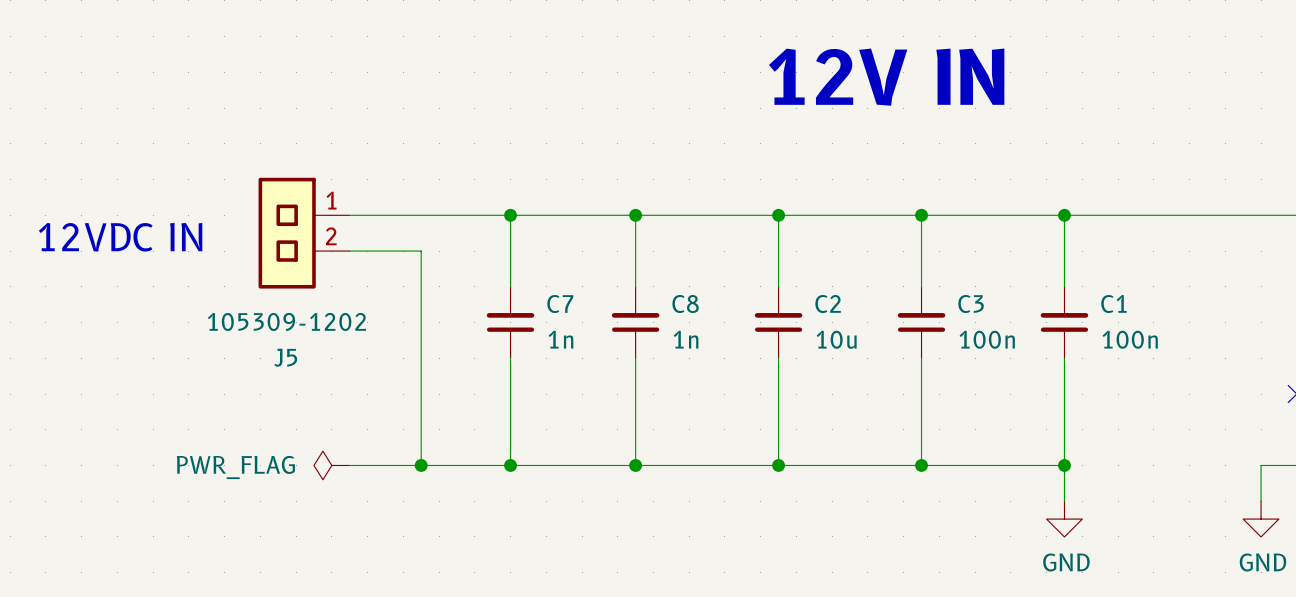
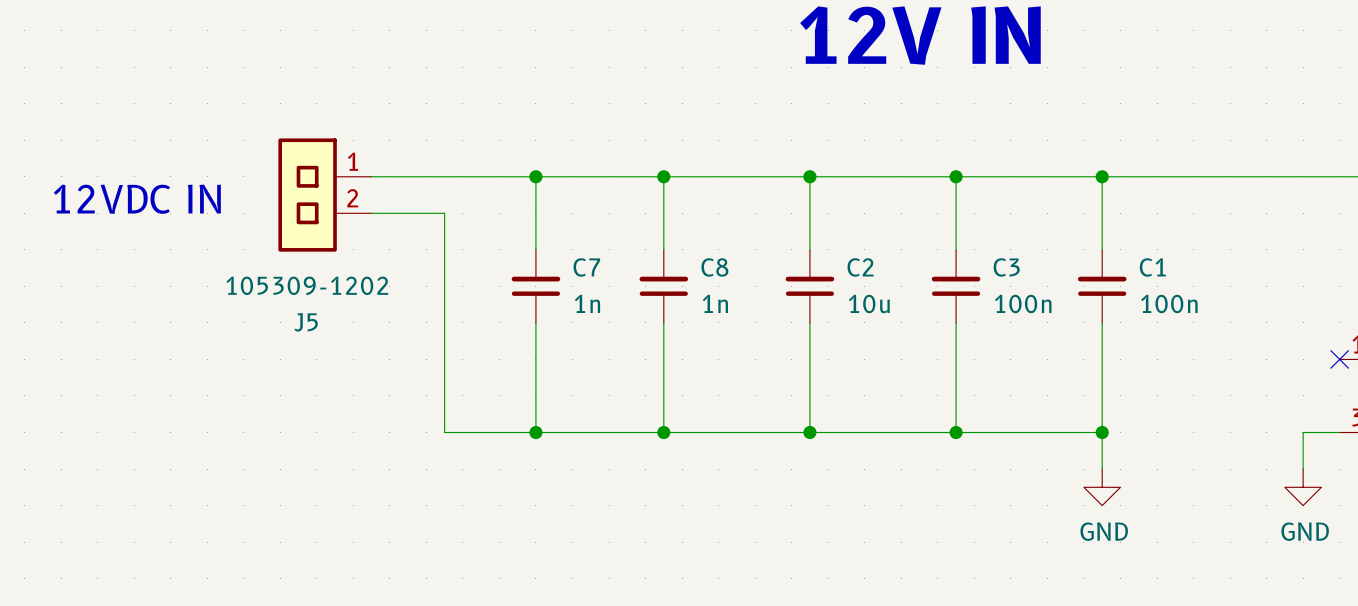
power symbol: PWR_FLAG (331, 465) -> none
wire: (349, 465) (421, 465) -> none
junction: (421, 465) -> none

